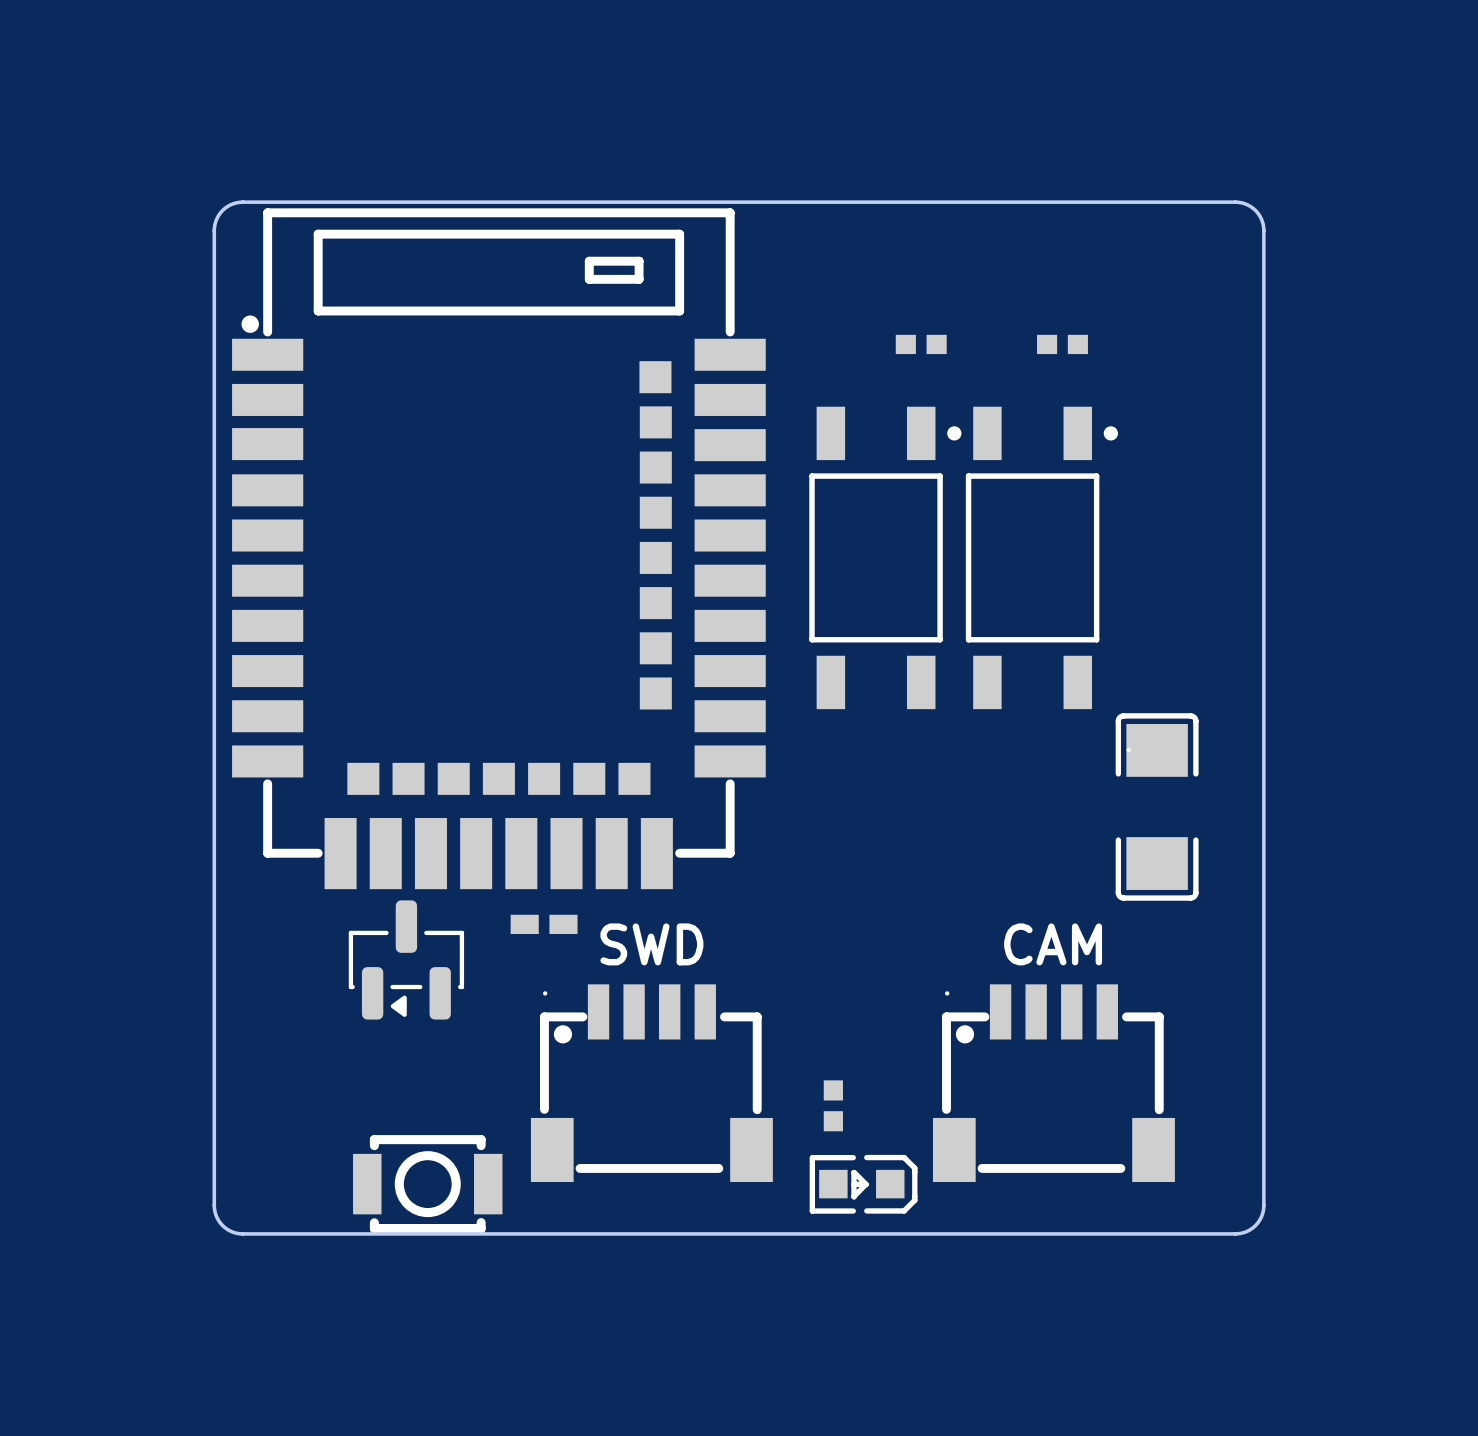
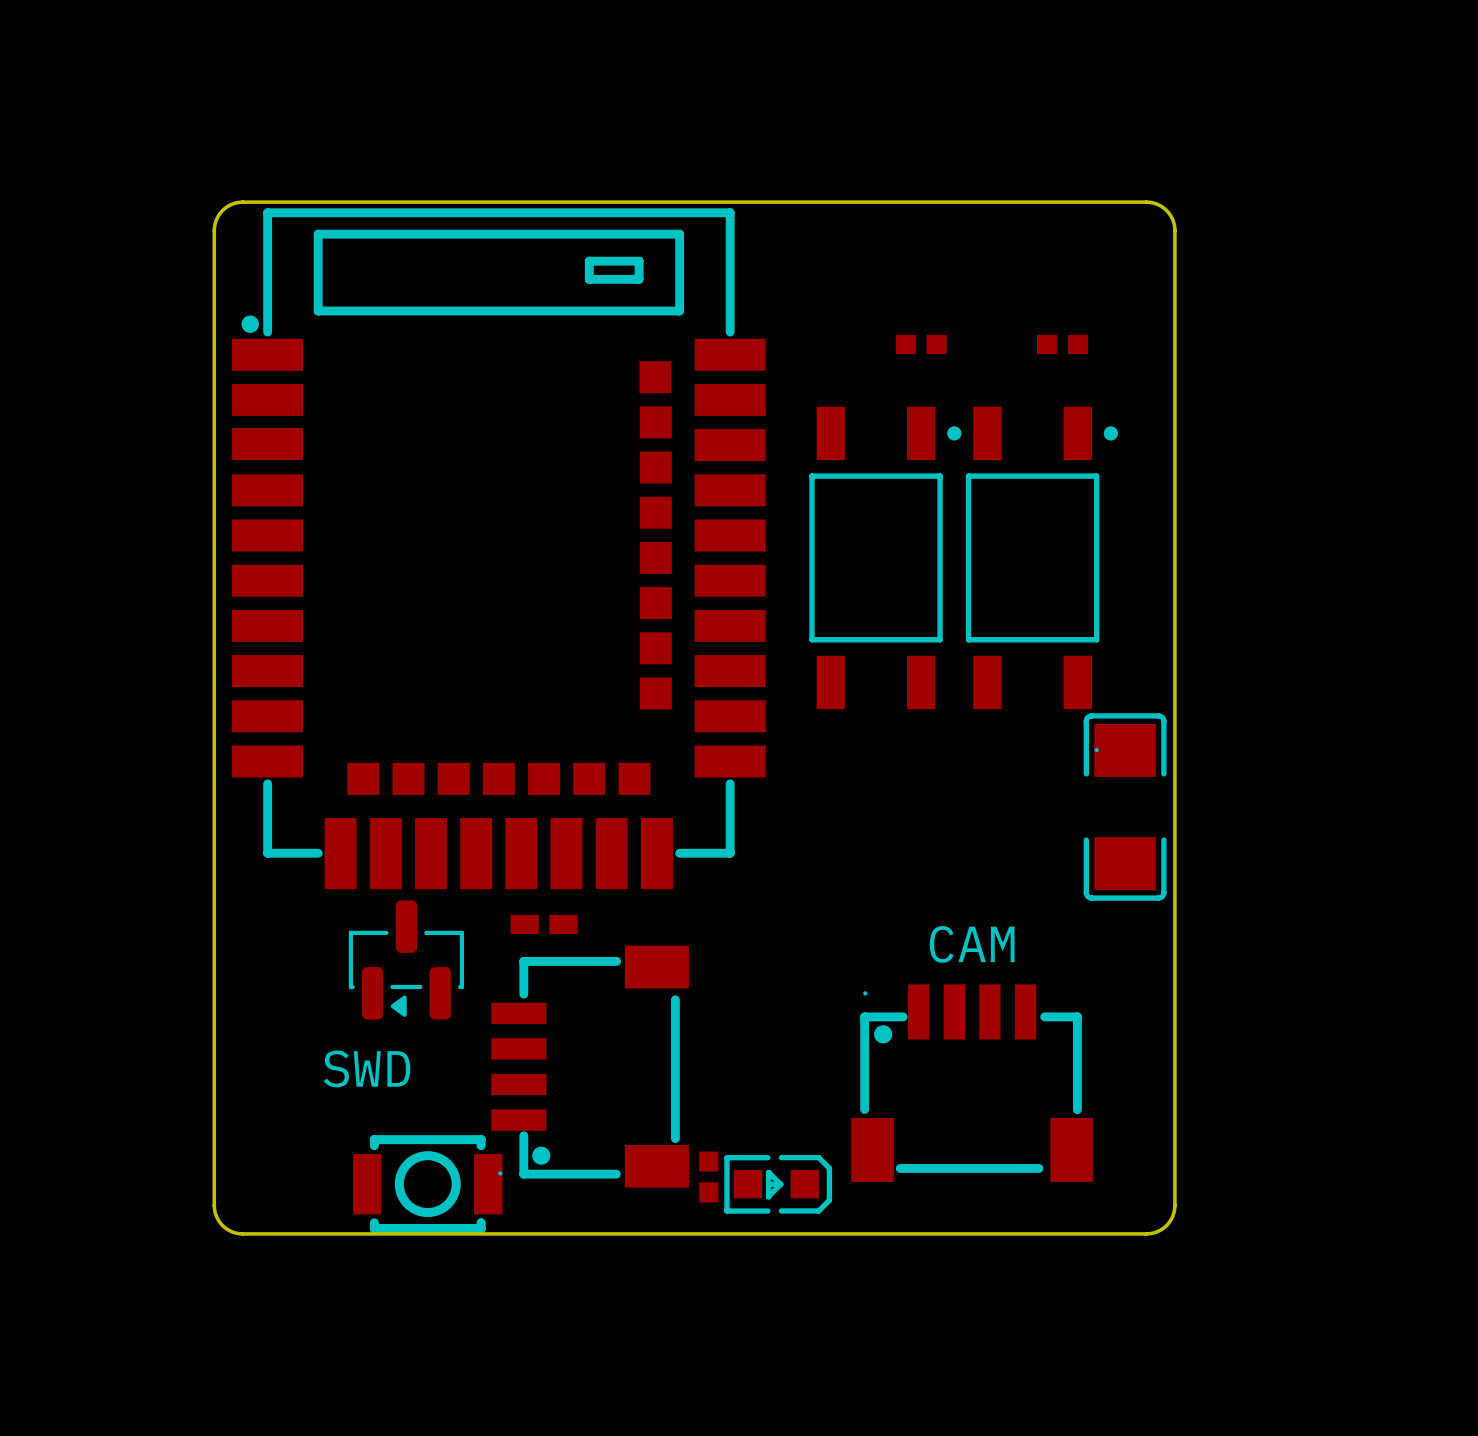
board edge: (1146, 202) (1241, 202) (1250, 206) (1257, 212) (1262, 221) (1263, 230) (1263, 1209) (1257, 1222) (1242, 1232) (1146, 1233) -> (1146, 202) (1158, 204) (1166, 210) (1172, 218) (1174, 230) (1174, 1205) (1172, 1216) (1166, 1225) (1157, 1231) (1146, 1233)
part position: (1157, 806) -> (1125, 806)
text position: SWD (651, 944) -> SWD (366, 1068)
text position: CAM (1053, 944) -> CAM (972, 944)
part rotation: 0° (651, 1083) -> 90° counterclockwise (590, 1066)
part position: (1053, 1083) -> (972, 1083)
part position: (833, 1105) -> (708, 1177)
part position: (863, 1184) -> (778, 1184)

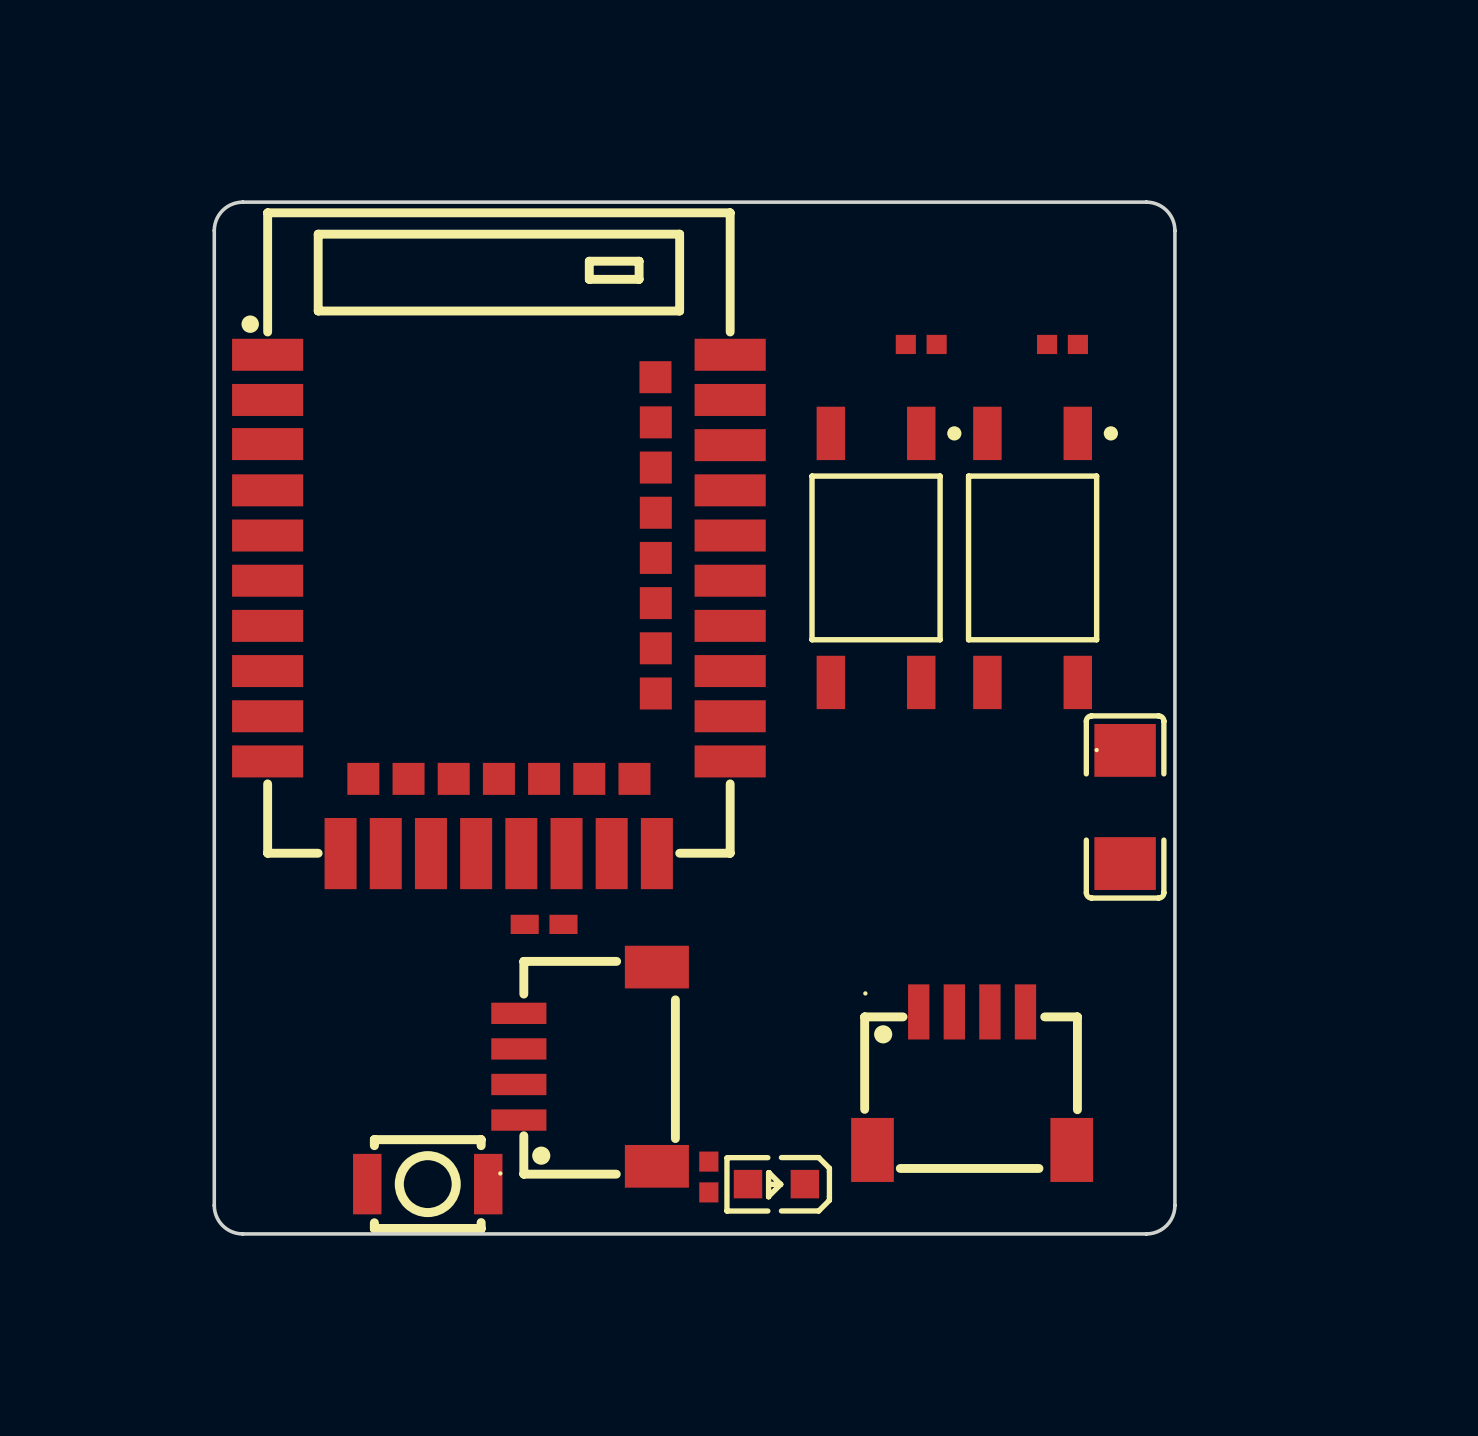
text: CAM (972, 944) -> none
part: (406, 959) -> none
text: SWD (366, 1068) -> none

